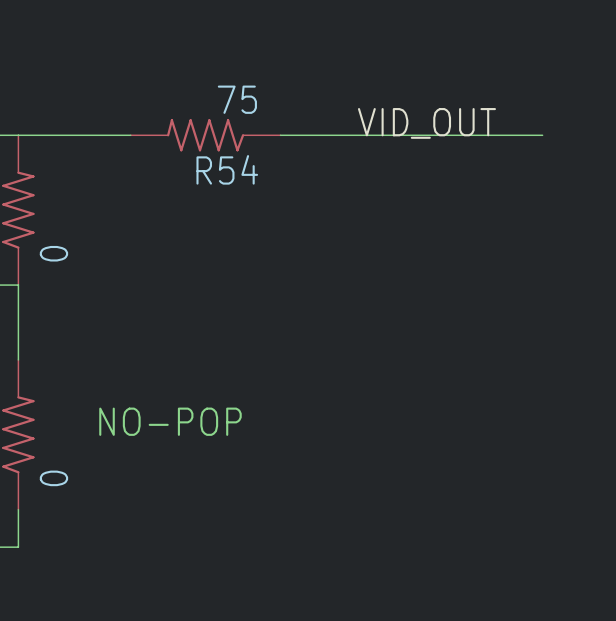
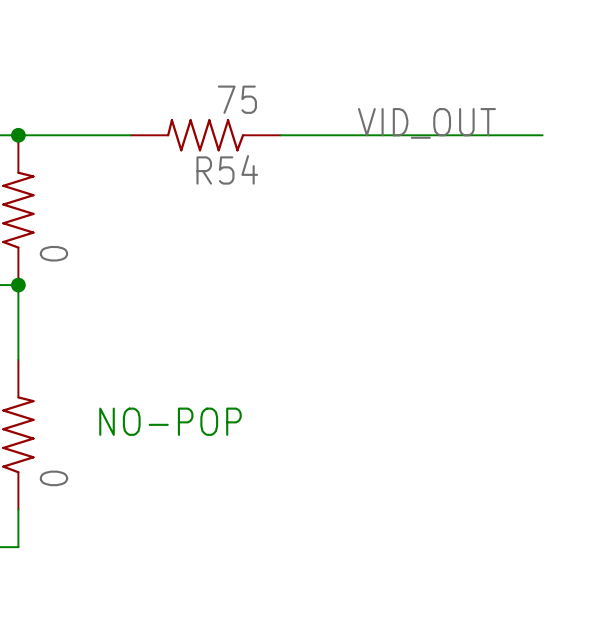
junction: none -> (18, 135)
junction: none -> (18, 285)

